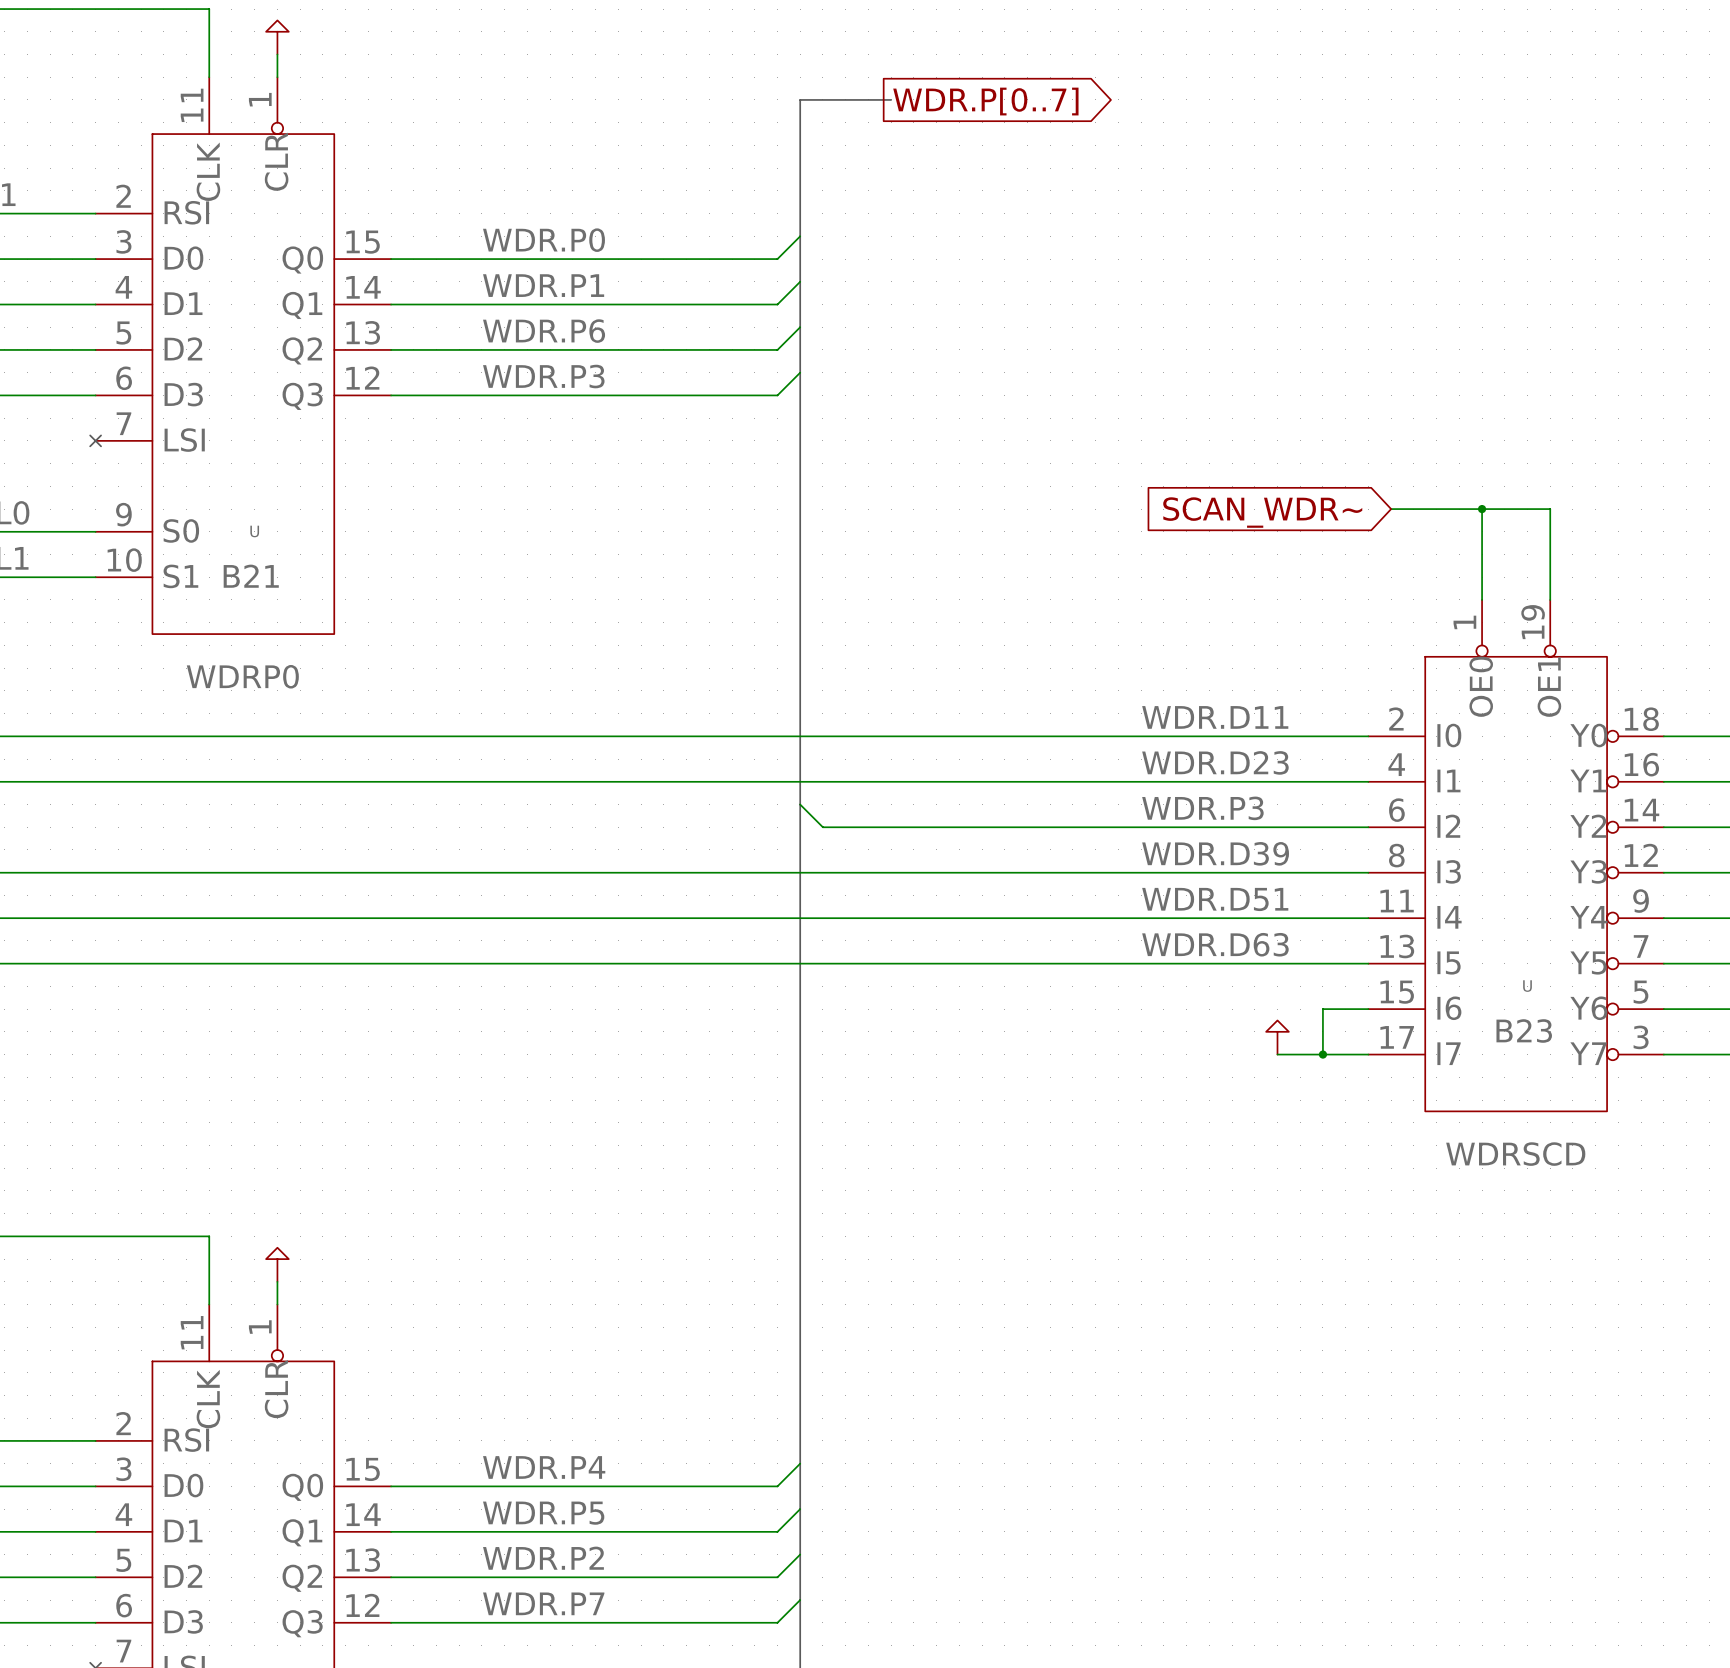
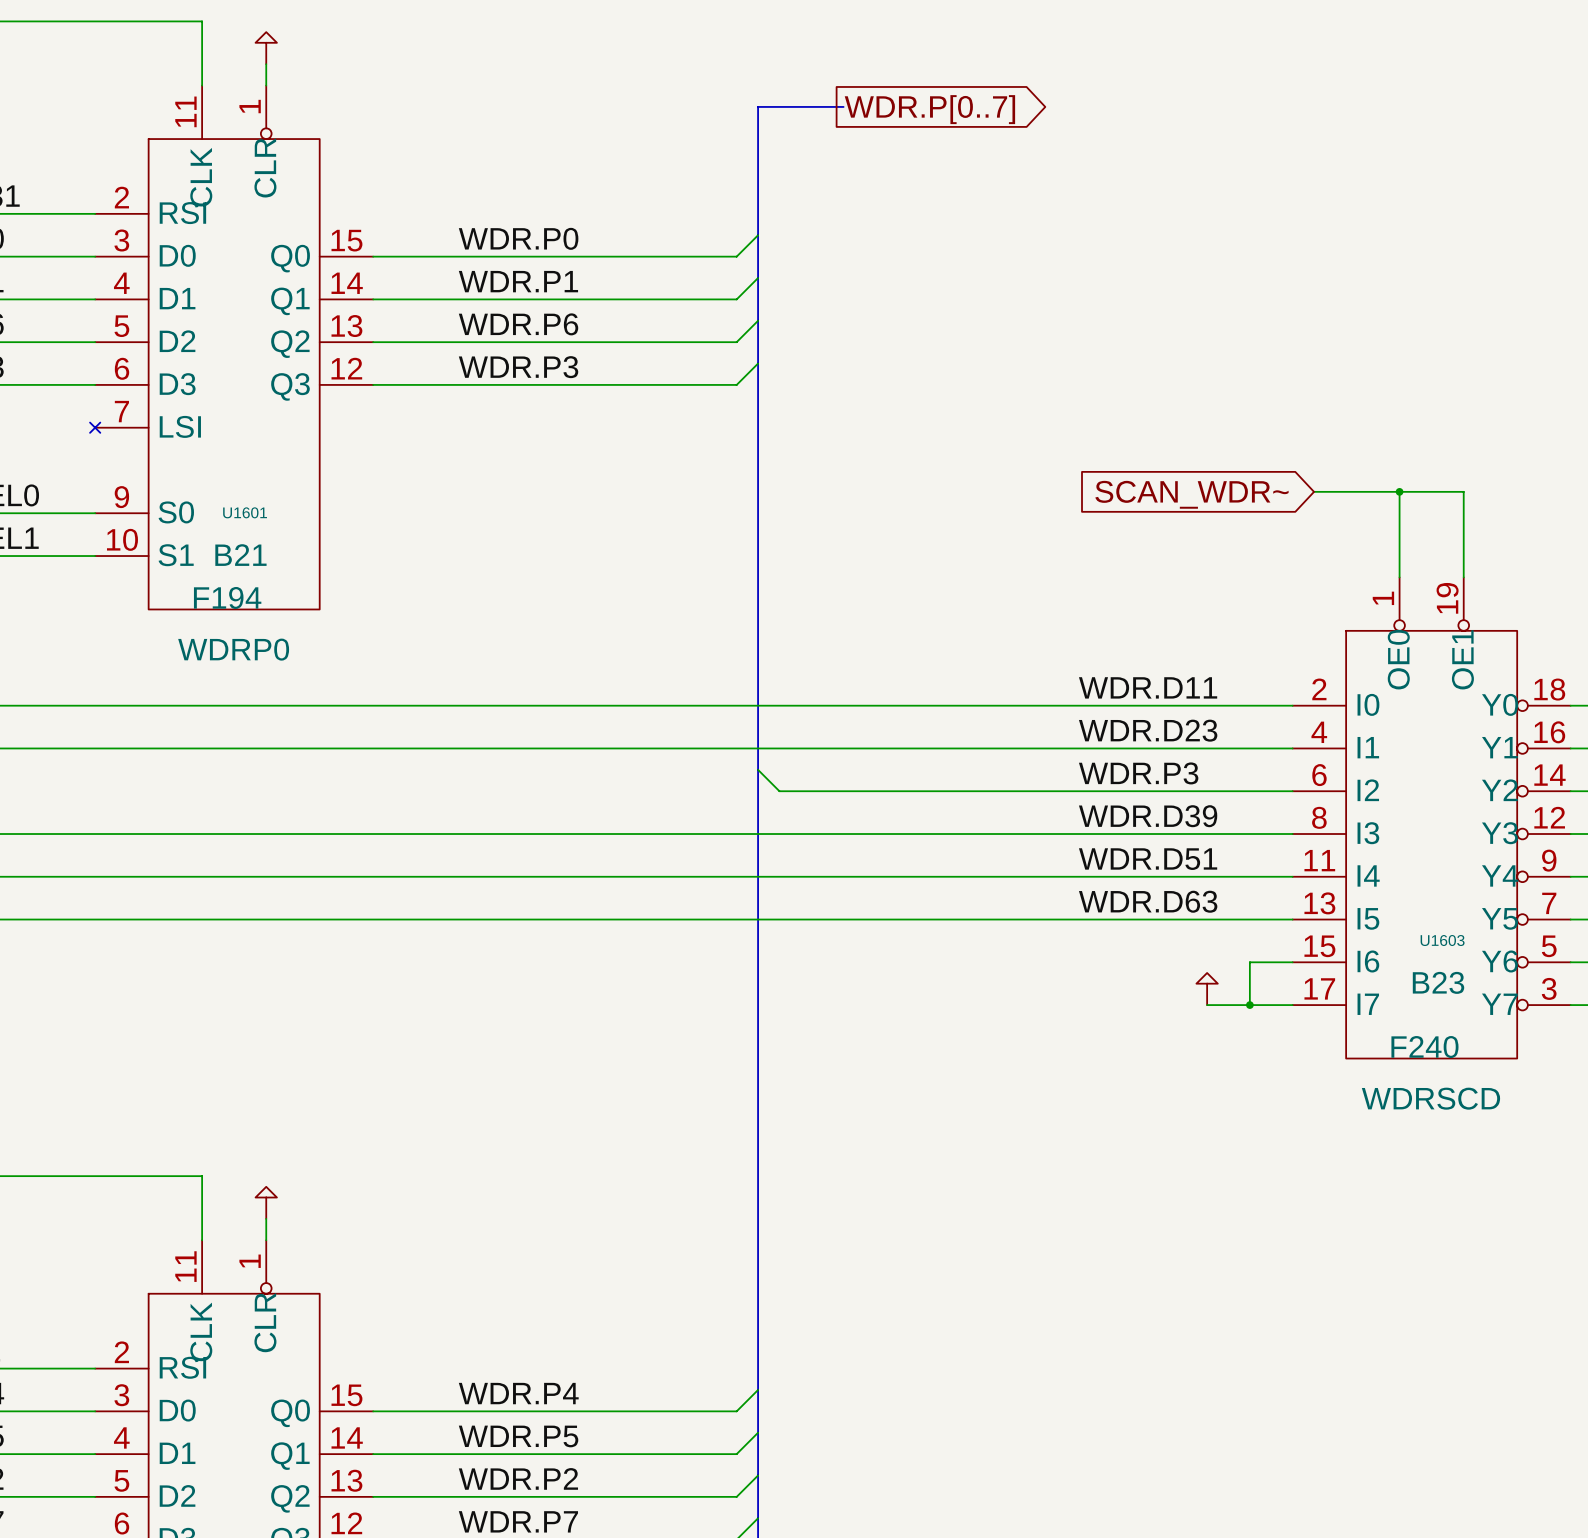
U name: U (254, 531) -> U1601 (245, 512)
U value: none -> F194 (227, 597)
U name: U (1527, 986) -> U1603 (1442, 940)
U value: none -> F240 (1424, 1047)

